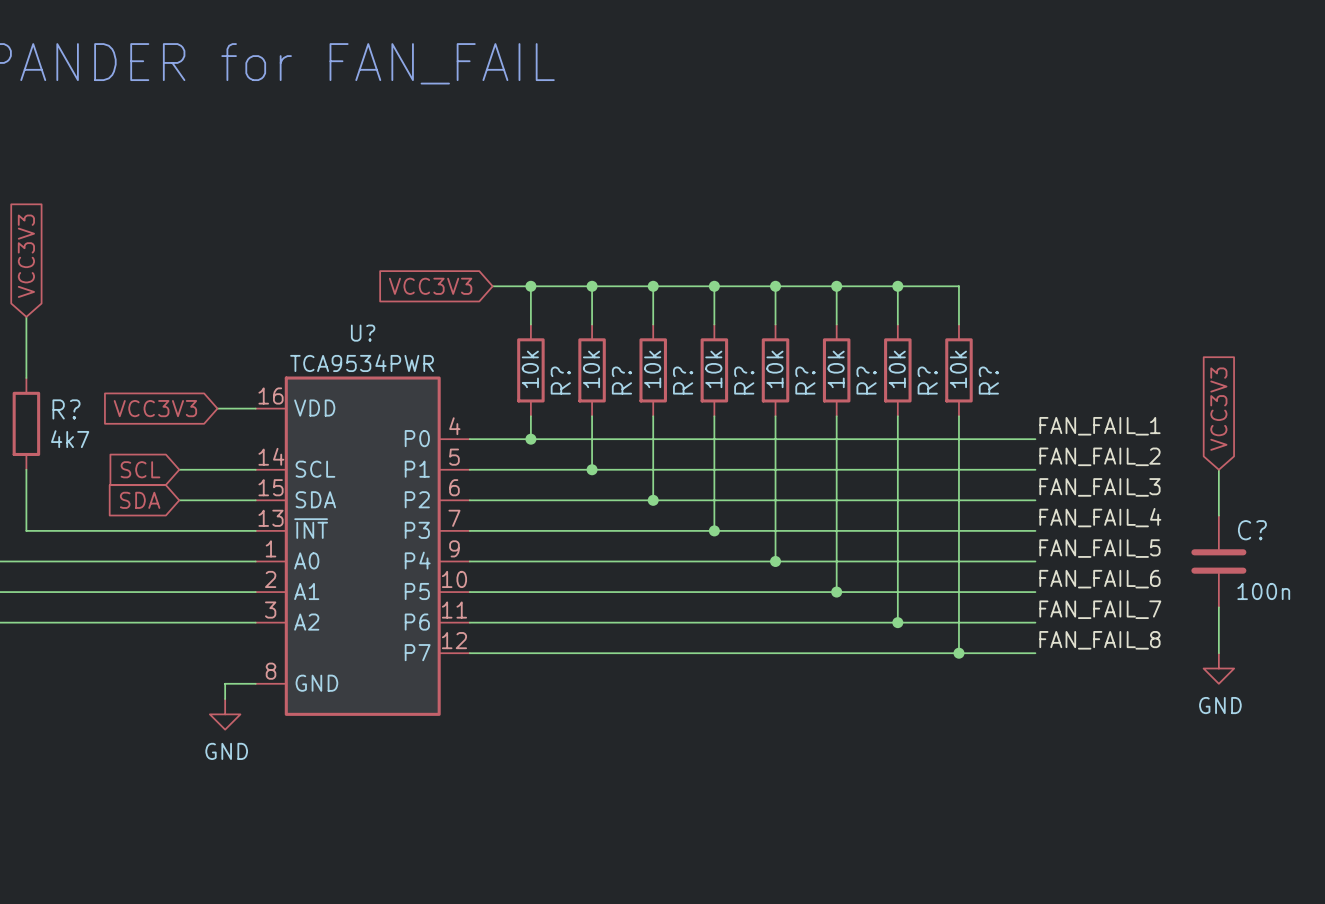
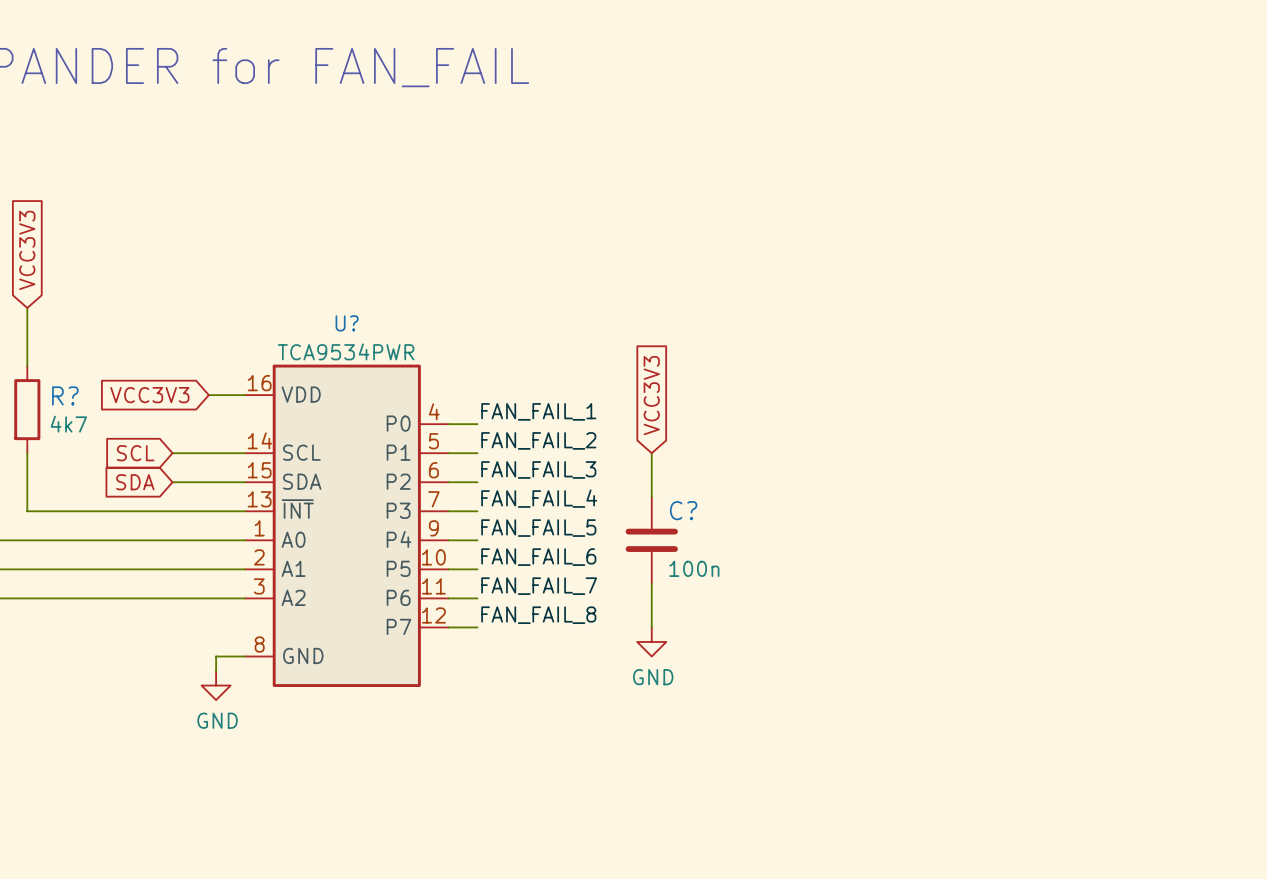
global label rotation: 0° (430, 286) -> 90° clockwise (651, 395)
global label position: VCC3V3 (430, 286) -> VCC3V3 (651, 395)
wire: (492, 286) (958, 286) (958, 324) -> none
wire: (530, 286) (530, 324) -> none
junction: (530, 286) -> none
wire: (592, 286) (592, 324) -> none
junction: (592, 286) -> none
wire: (653, 286) (653, 324) -> none
junction: (653, 286) -> none
wire: (714, 286) (714, 324) -> none
junction: (714, 286) -> none
wire: (775, 286) (775, 324) -> none
junction: (775, 286) -> none
wire: (836, 286) (836, 324) -> none
junction: (836, 286) -> none
wire: (897, 286) (897, 324) -> none
junction: (897, 286) -> none
R?: (530, 370) -> none
R?: (592, 370) -> none
R?: (653, 370) -> none
R?: (714, 370) -> none
R?: (775, 370) -> none
R?: (836, 370) -> none
R?: (897, 370) -> none
R?: (958, 370) -> none
global label: VCC3V3 (1218, 409) -> none
wire: (530, 416) (530, 439) -> none
wire: (592, 416) (592, 469) -> none
wire: (653, 416) (653, 500) -> none
wire: (714, 416) (714, 530) -> none
wire: (775, 416) (775, 561) -> none
wire: (836, 416) (836, 592) -> none
wire: (897, 416) (897, 622) -> none
wire: (958, 416) (958, 653) -> none
label: none -> FAN_FAIL_1 (538, 411)
label: FAN_FAIL_1 (1099, 426) -> none
wire: (500, 439) (1035, 439) -> none
junction: (530, 439) -> none
label: none -> FAN_FAIL_2 (538, 440)
label: FAN_FAIL_2 (1099, 456) -> none
wire: (500, 469) (1035, 469) -> none
junction: (592, 469) -> none
wire: none -> (651, 453) (651, 496)
wire: (1218, 469) (1218, 515) -> none
label: none -> FAN_FAIL_3 (538, 469)
label: FAN_FAIL_3 (1099, 487) -> none
wire: (500, 500) (1035, 500) -> none
junction: (653, 500) -> none
label: none -> FAN_FAIL_4 (539, 498)
label: FAN_FAIL_4 (1100, 517) -> none
wire: (500, 530) (1035, 530) -> none
junction: (714, 530) -> none
label: none -> FAN_FAIL_5 (538, 528)
label: FAN_FAIL_5 (1099, 548) -> none
wire: (500, 561) (1035, 561) -> none
C?: none -> (651, 540)
junction: (775, 561) -> none
C?: (1218, 561) -> none
label: none -> FAN_FAIL_6 (538, 557)
label: FAN_FAIL_6 (1099, 579) -> none
wire: (500, 592) (1035, 592) -> none
junction: (836, 592) -> none
wire: none -> (651, 583) (651, 627)
wire: (1218, 607) (1218, 653) -> none
label: none -> FAN_FAIL_7 (539, 586)
label: FAN_FAIL_7 (1100, 609) -> none
wire: (500, 622) (1035, 622) -> none
junction: (897, 622) -> none
label: none -> FAN_FAIL_8 (538, 615)
label: FAN_FAIL_8 (1099, 640) -> none
wire: (500, 653) (1035, 653) -> none
junction: (958, 653) -> none
power symbol: none -> GND (651, 641)
power symbol: GND (1218, 668) -> none

